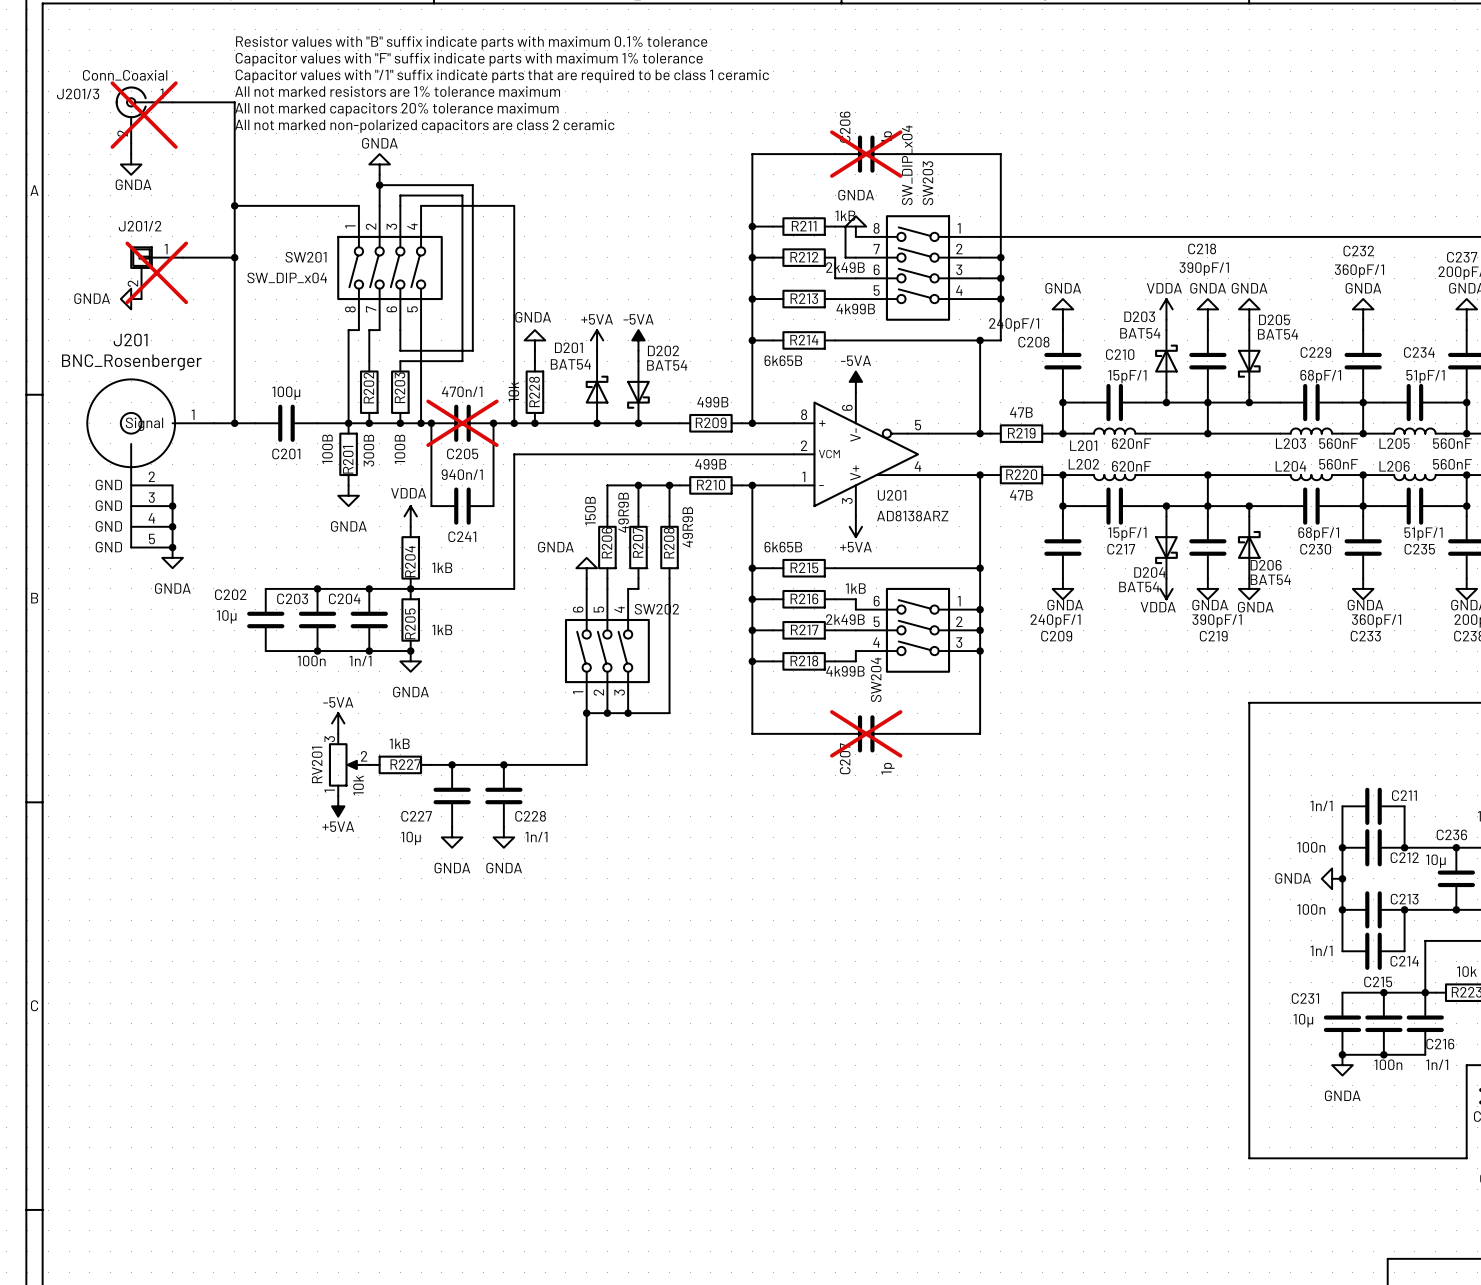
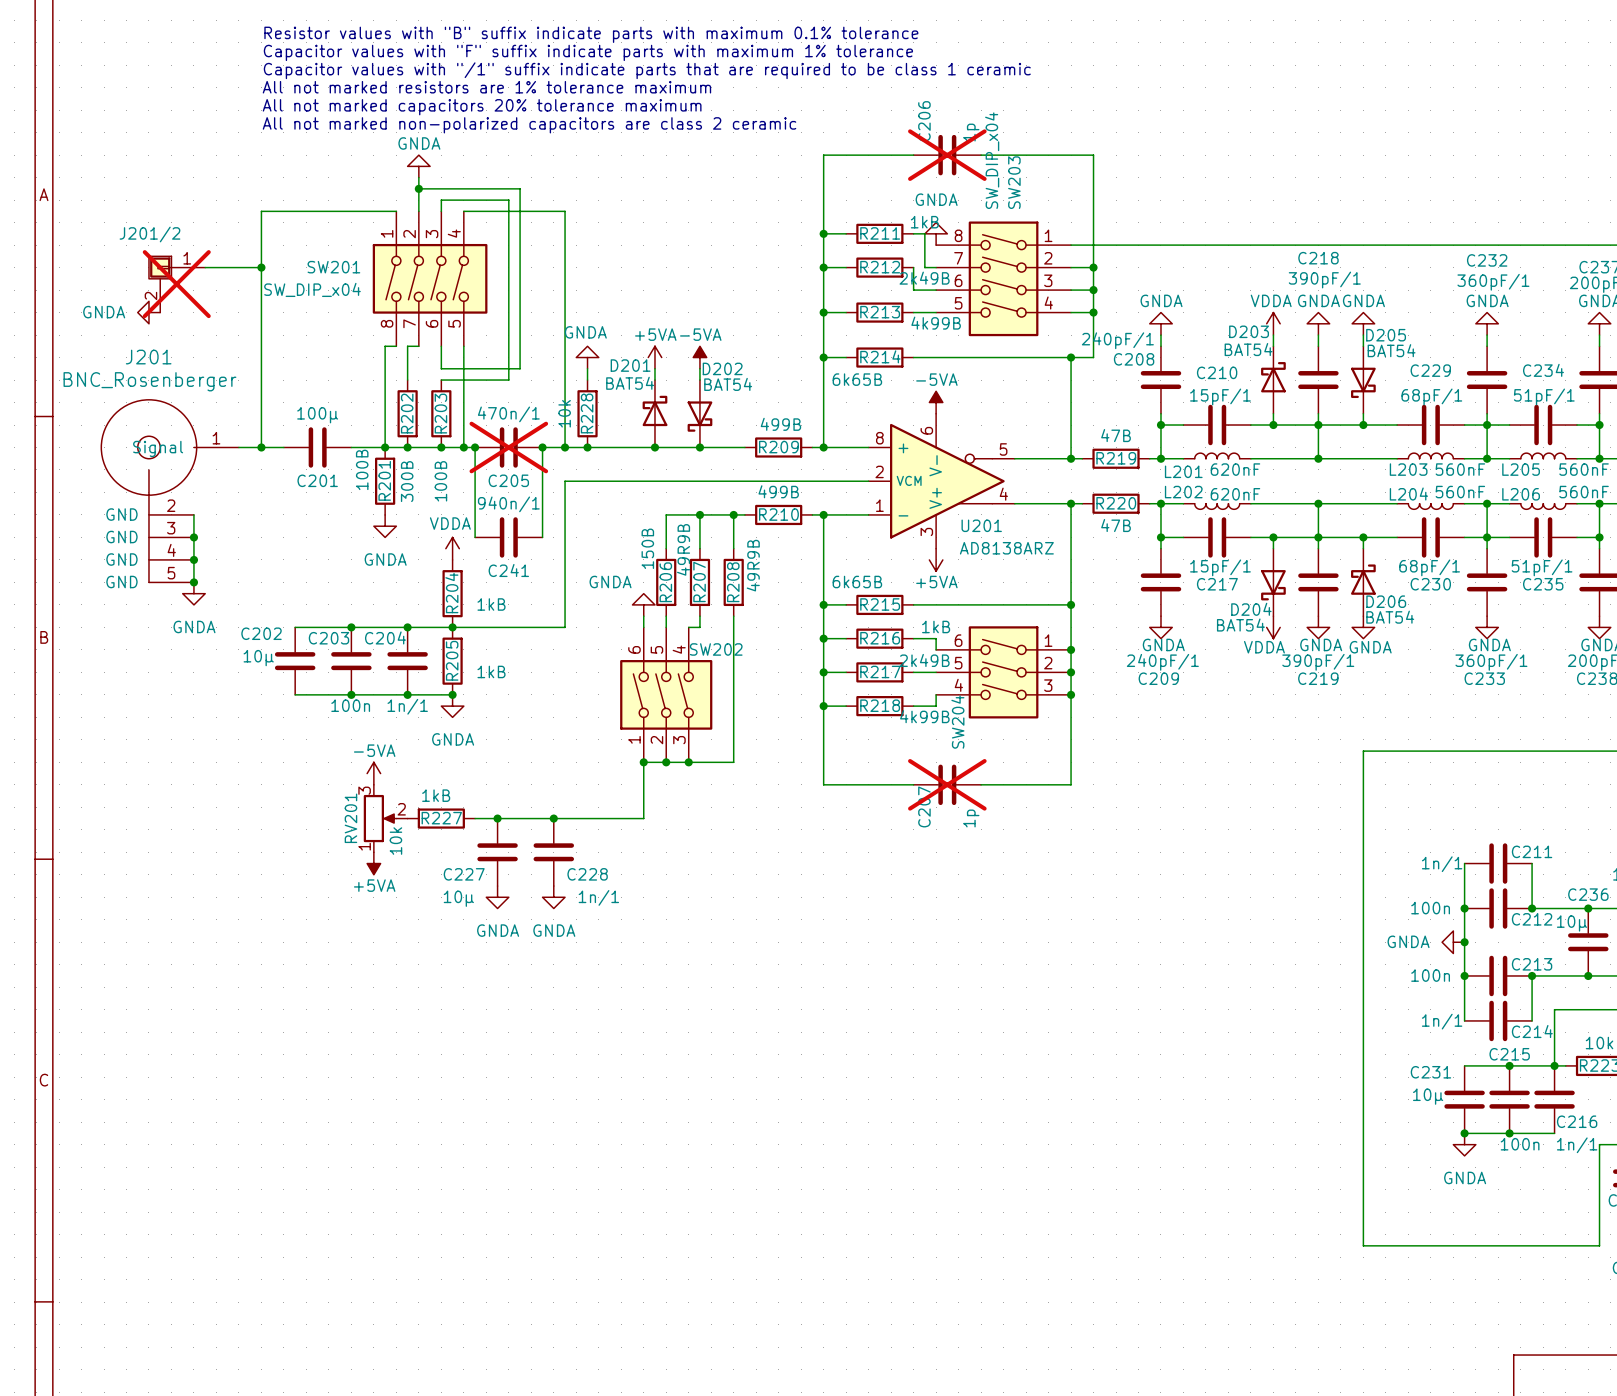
wire: (172, 102) (234, 102) (234, 205) -> none
J201/3: Conn_Coaxial (144, 115) -> none
wire: (131, 143) (131, 154) -> none
power symbol: GNDA (131, 164) -> none
junction: (234, 205) -> none

